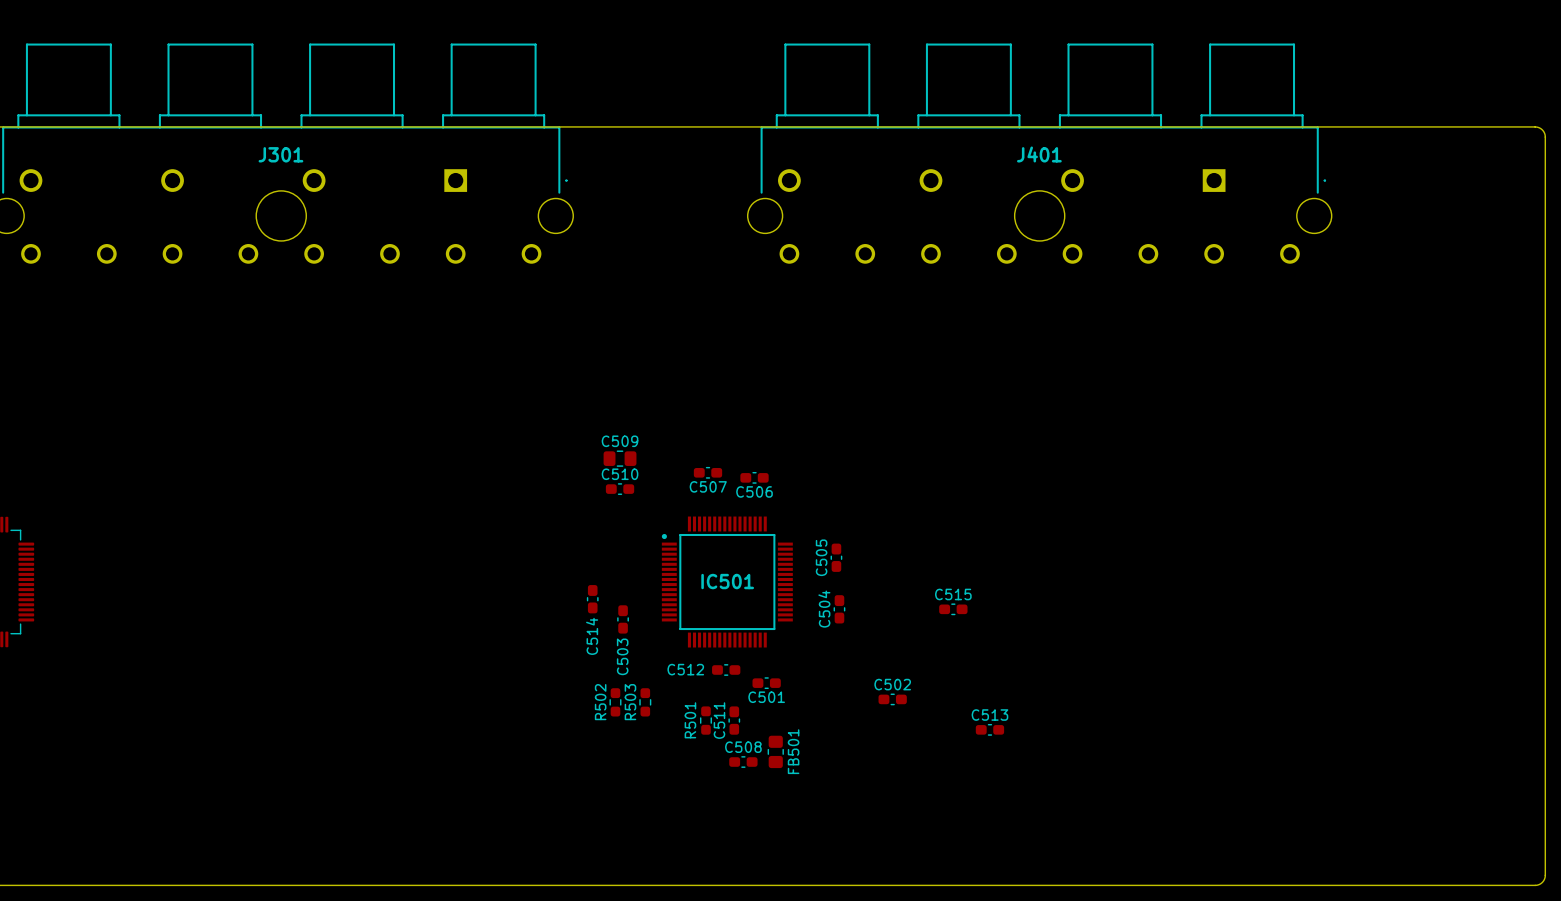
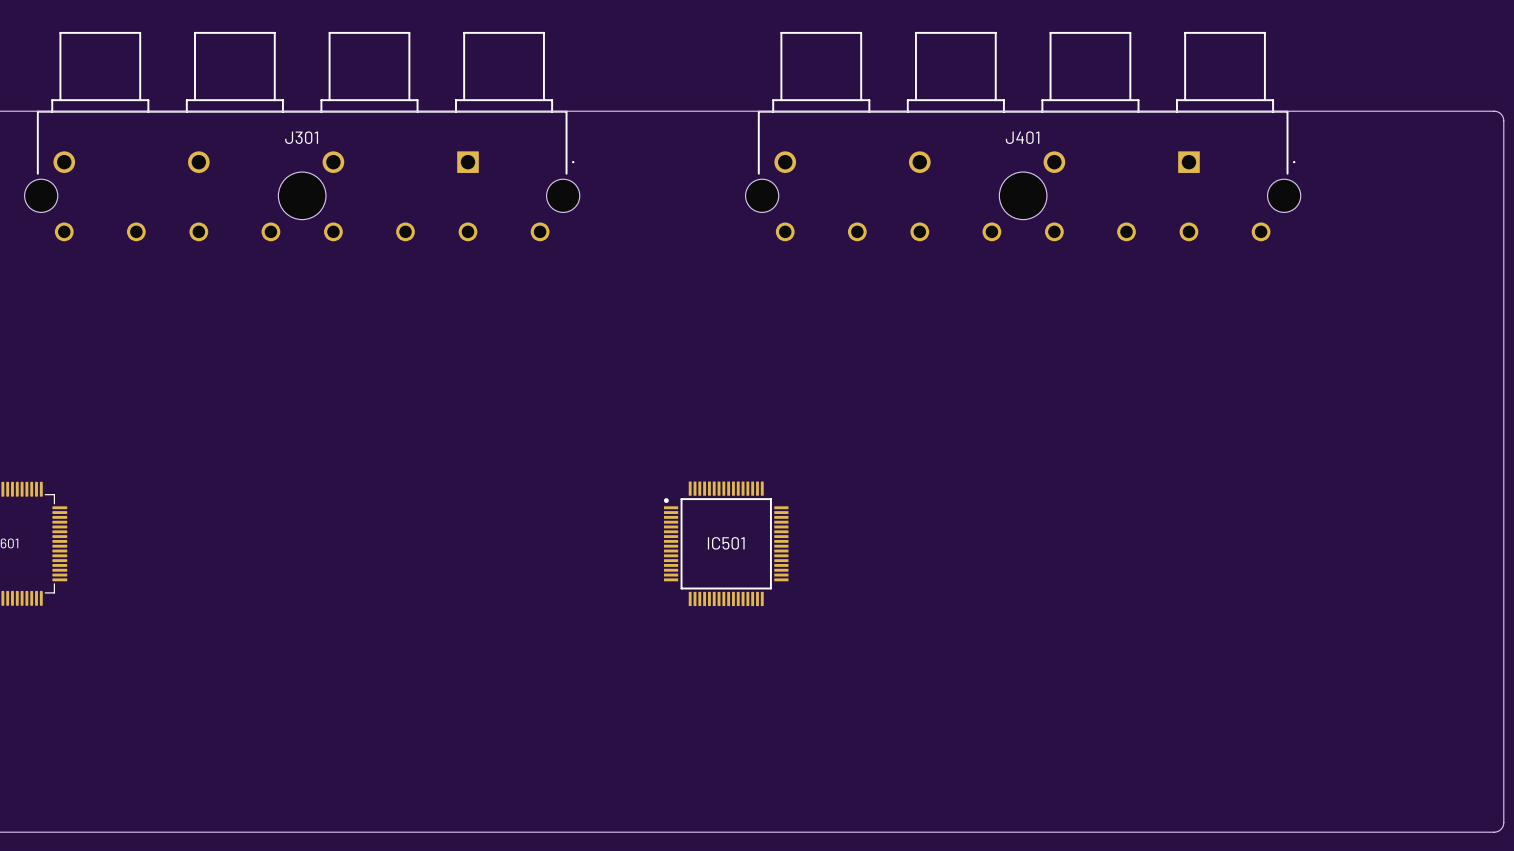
C509: (620, 458) -> none
C507: (708, 472) -> none
C506: (754, 477) -> none
C510: (620, 489) -> none
C505: (836, 557) -> none
C514: (592, 599) -> none
C504: (839, 609) -> none
C515: (953, 609) -> none
C503: (623, 619) -> none
C512: (726, 669) -> none
C501: (766, 683) -> none
C502: (892, 699) -> none
R502: (615, 702) -> none
R503: (645, 702) -> none
R501: (705, 720) -> none
C511: (734, 720) -> none
C513: (989, 729) -> none
FB501: (775, 751) -> none
C508: (743, 762) -> none

